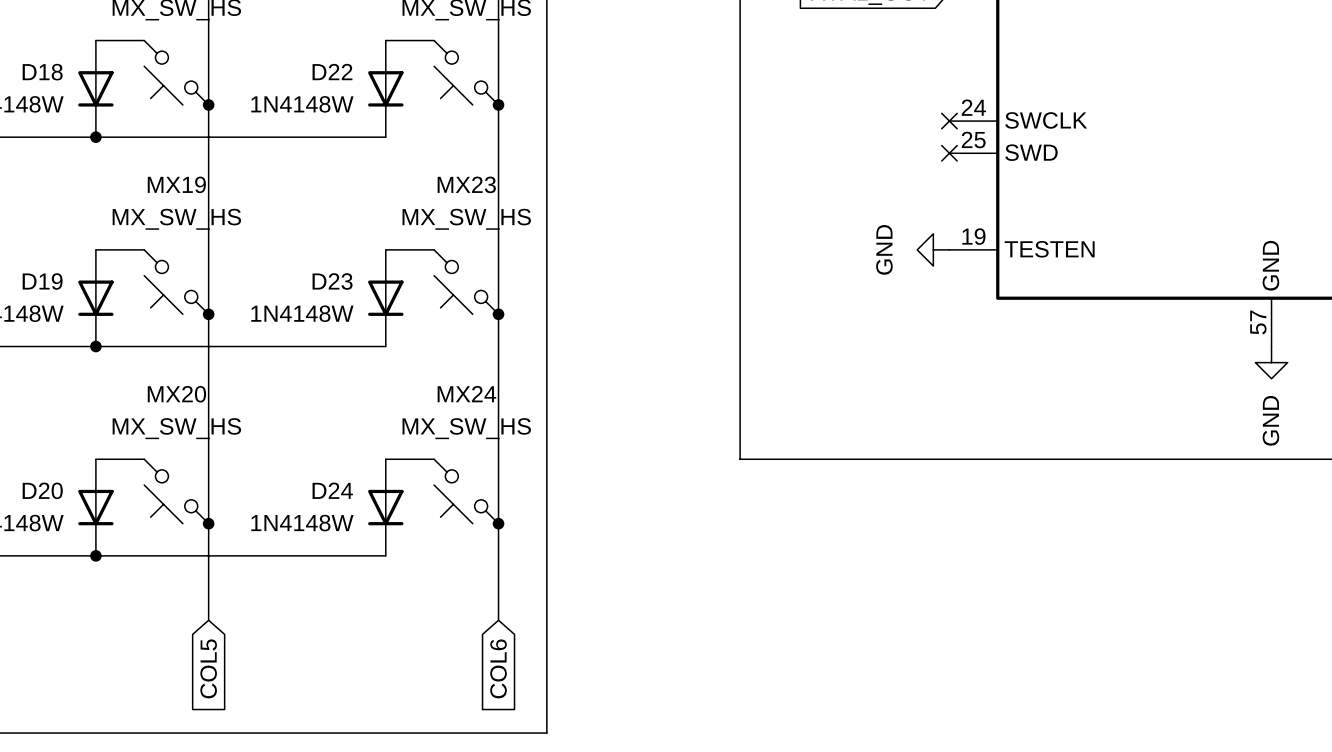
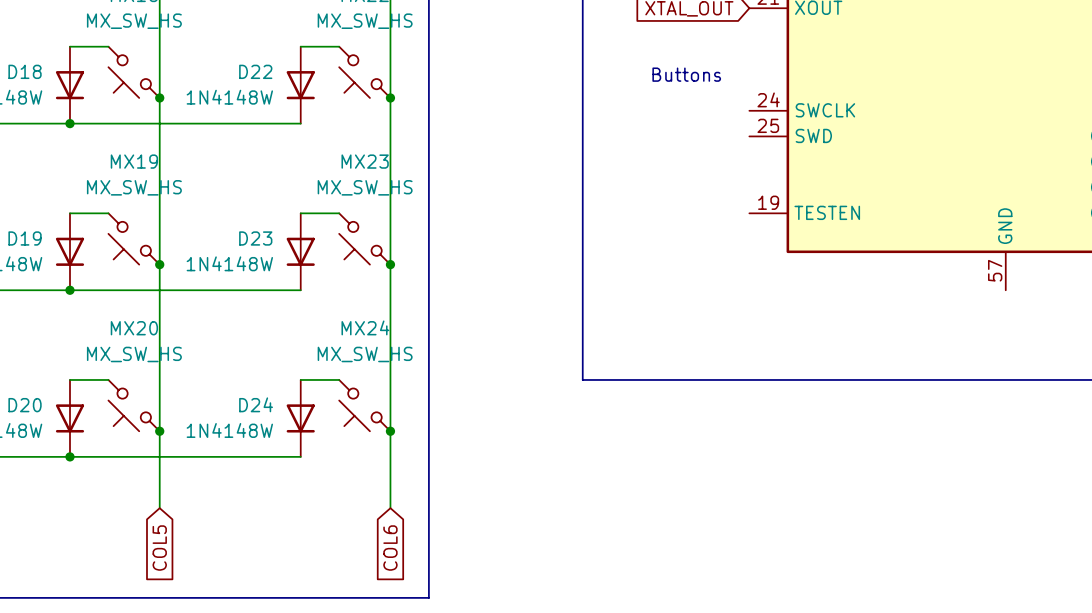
text: none -> Buttons (686, 74)
no-connect mark: (949, 121) -> none
no-connect mark: (949, 153) -> none
power symbol: GND (933, 249) -> none
power symbol: GND (1271, 362) -> none

